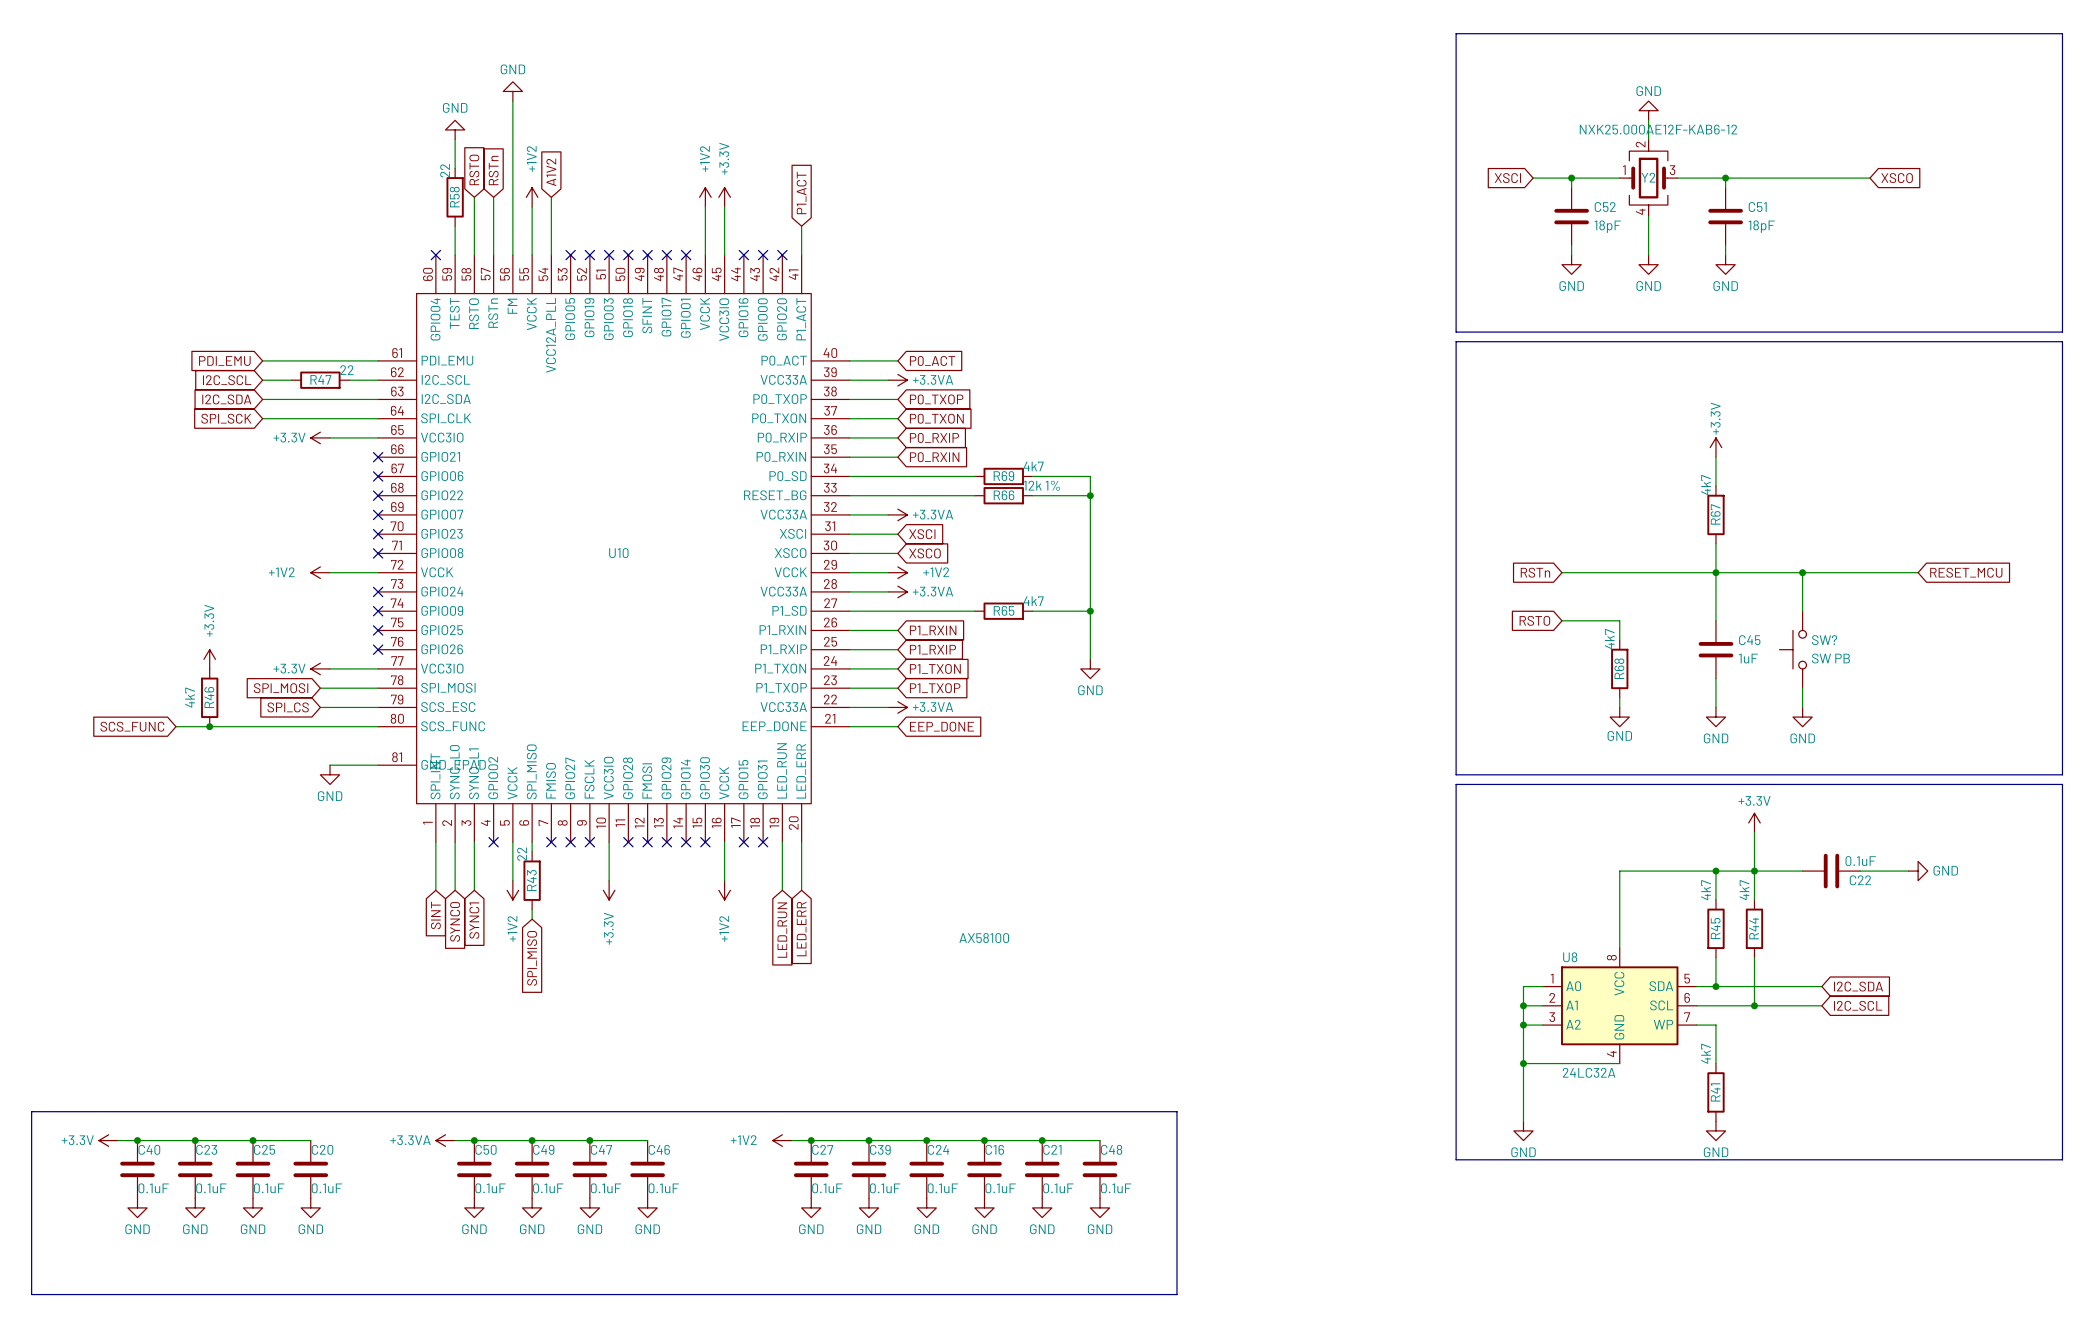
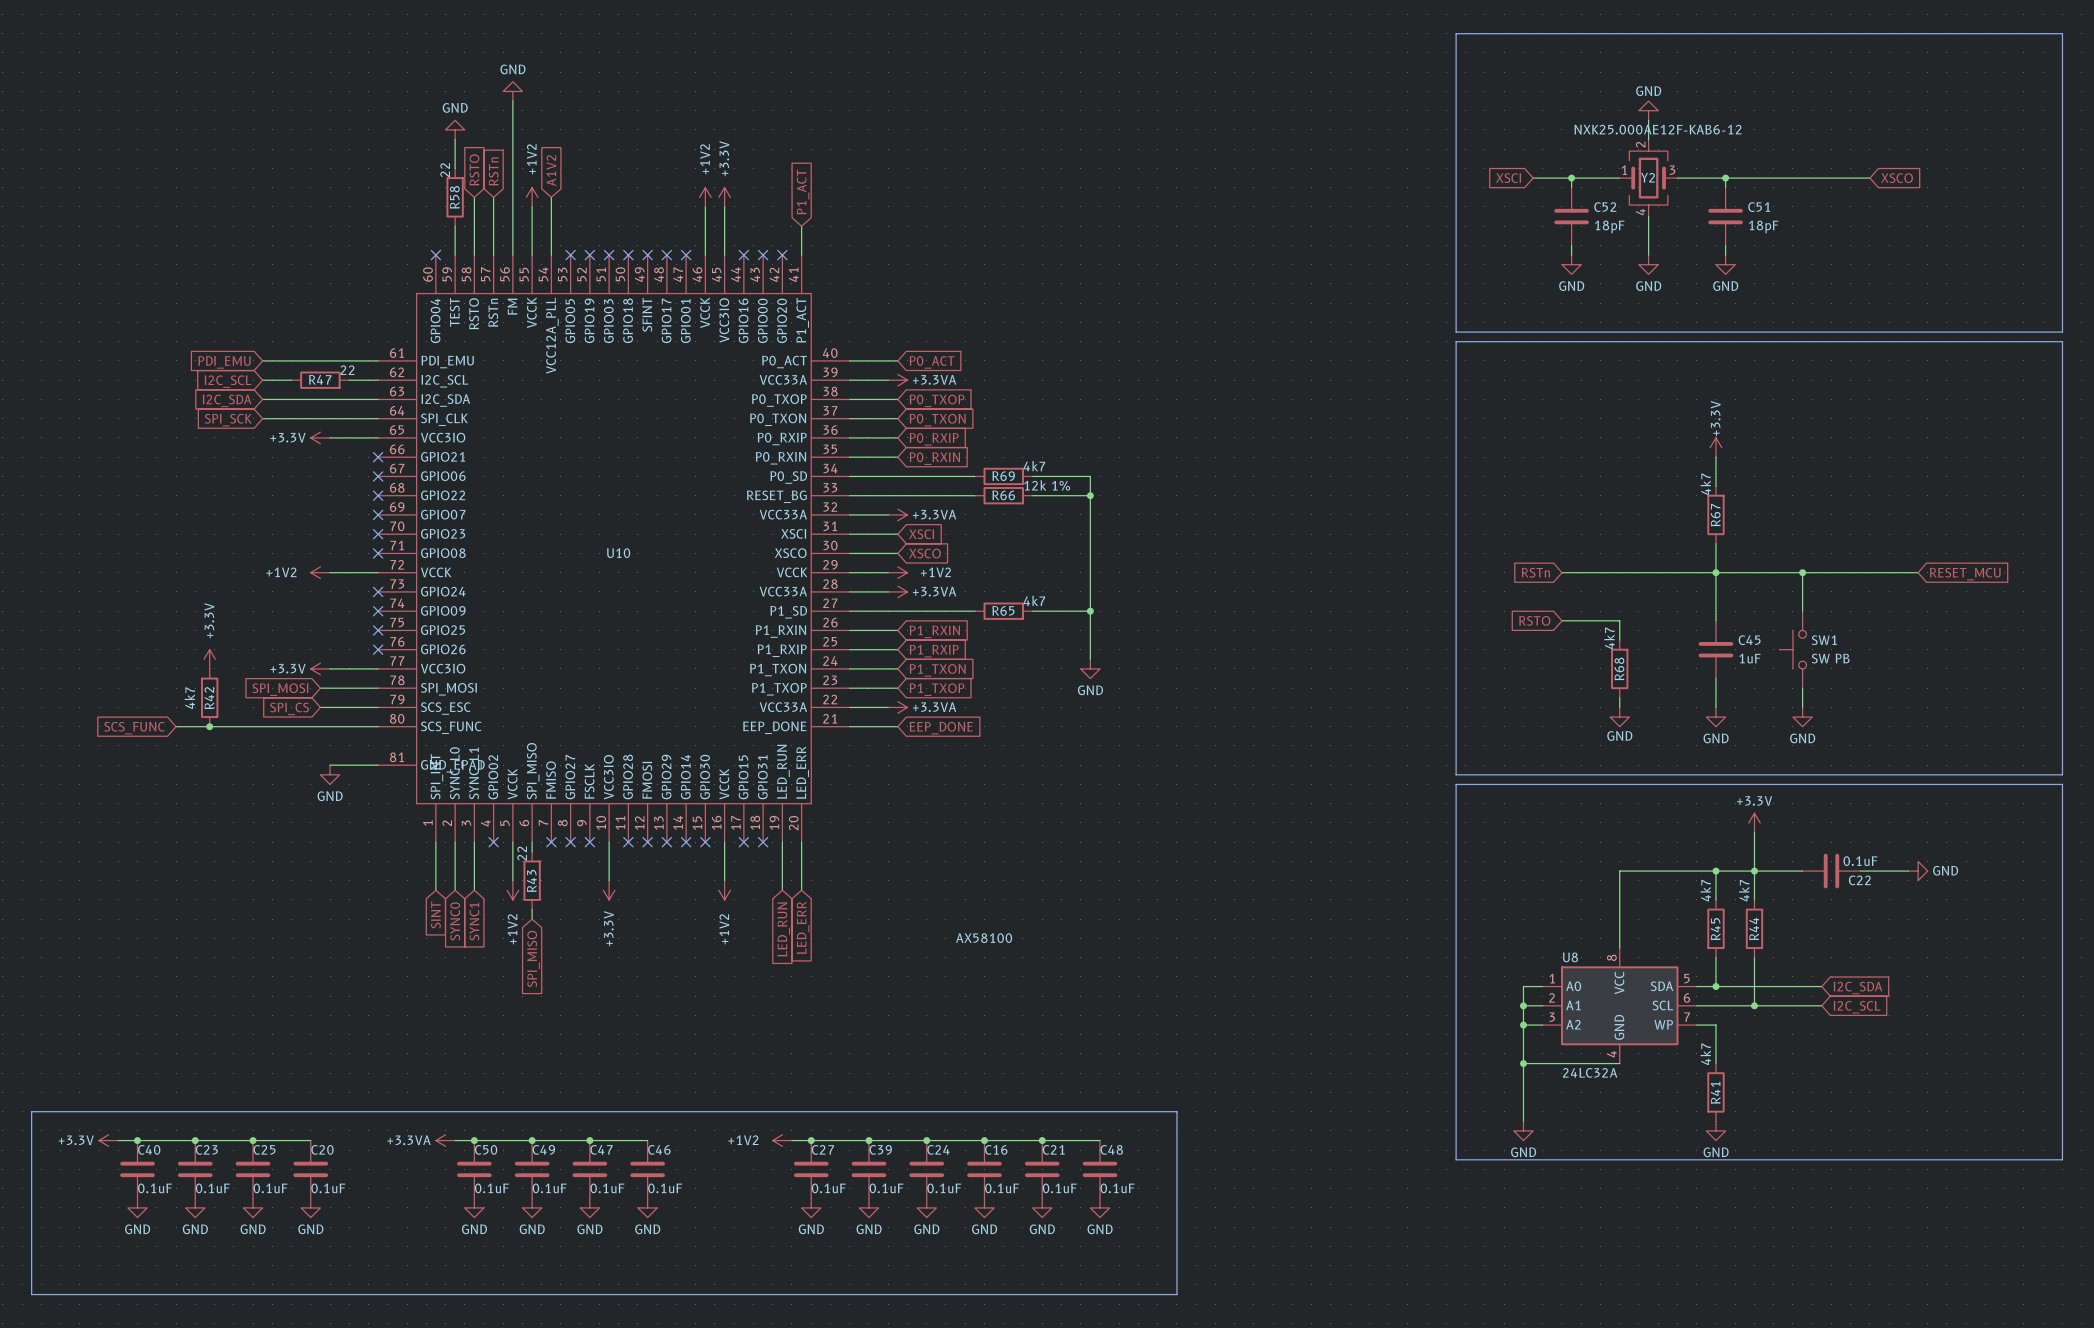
SW? name: SW? (1824, 640) -> SW1 (1824, 640)
R46 name: R46 (209, 697) -> R42 (209, 698)

